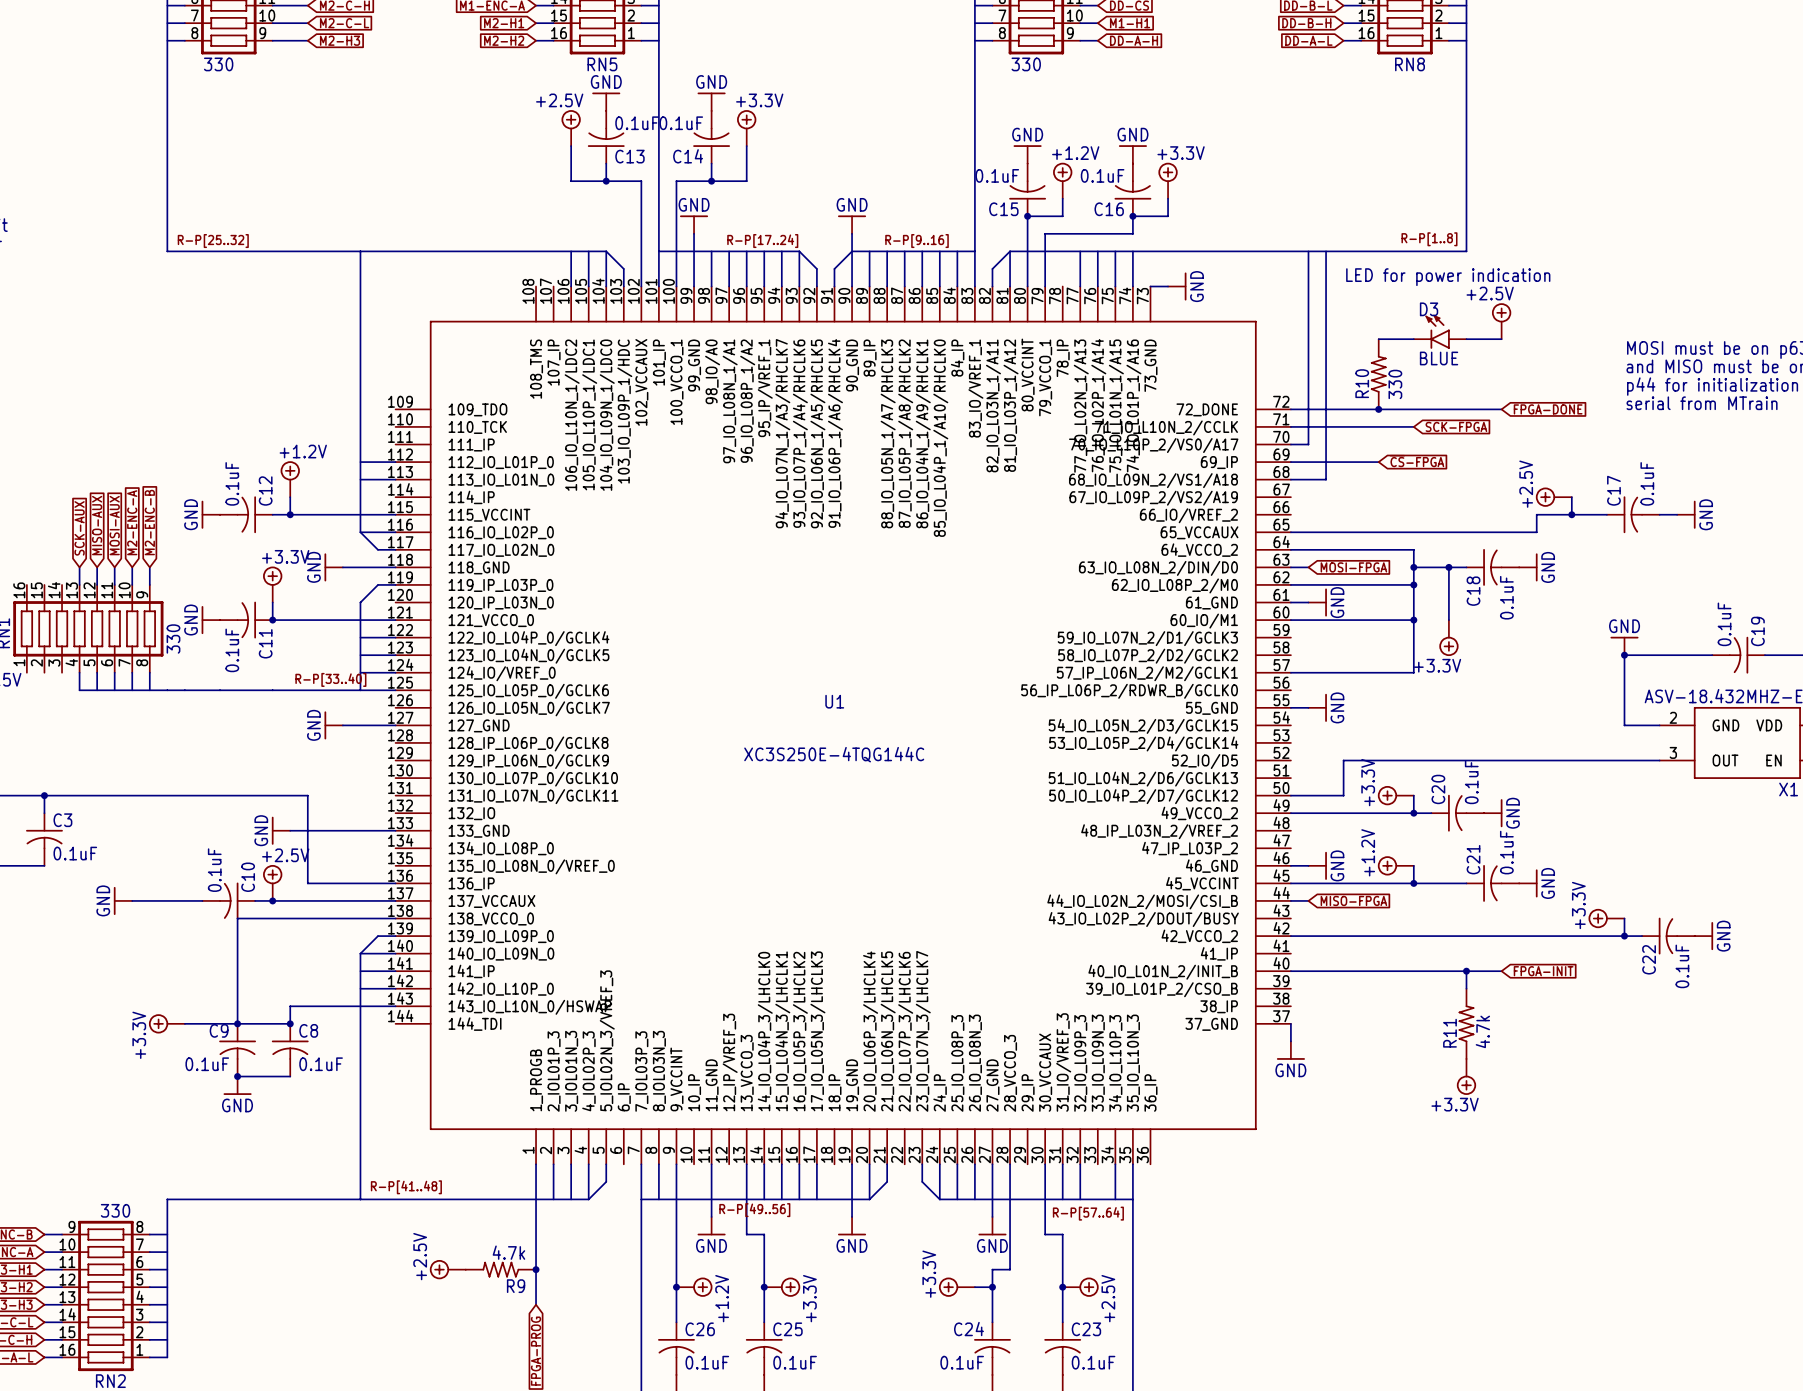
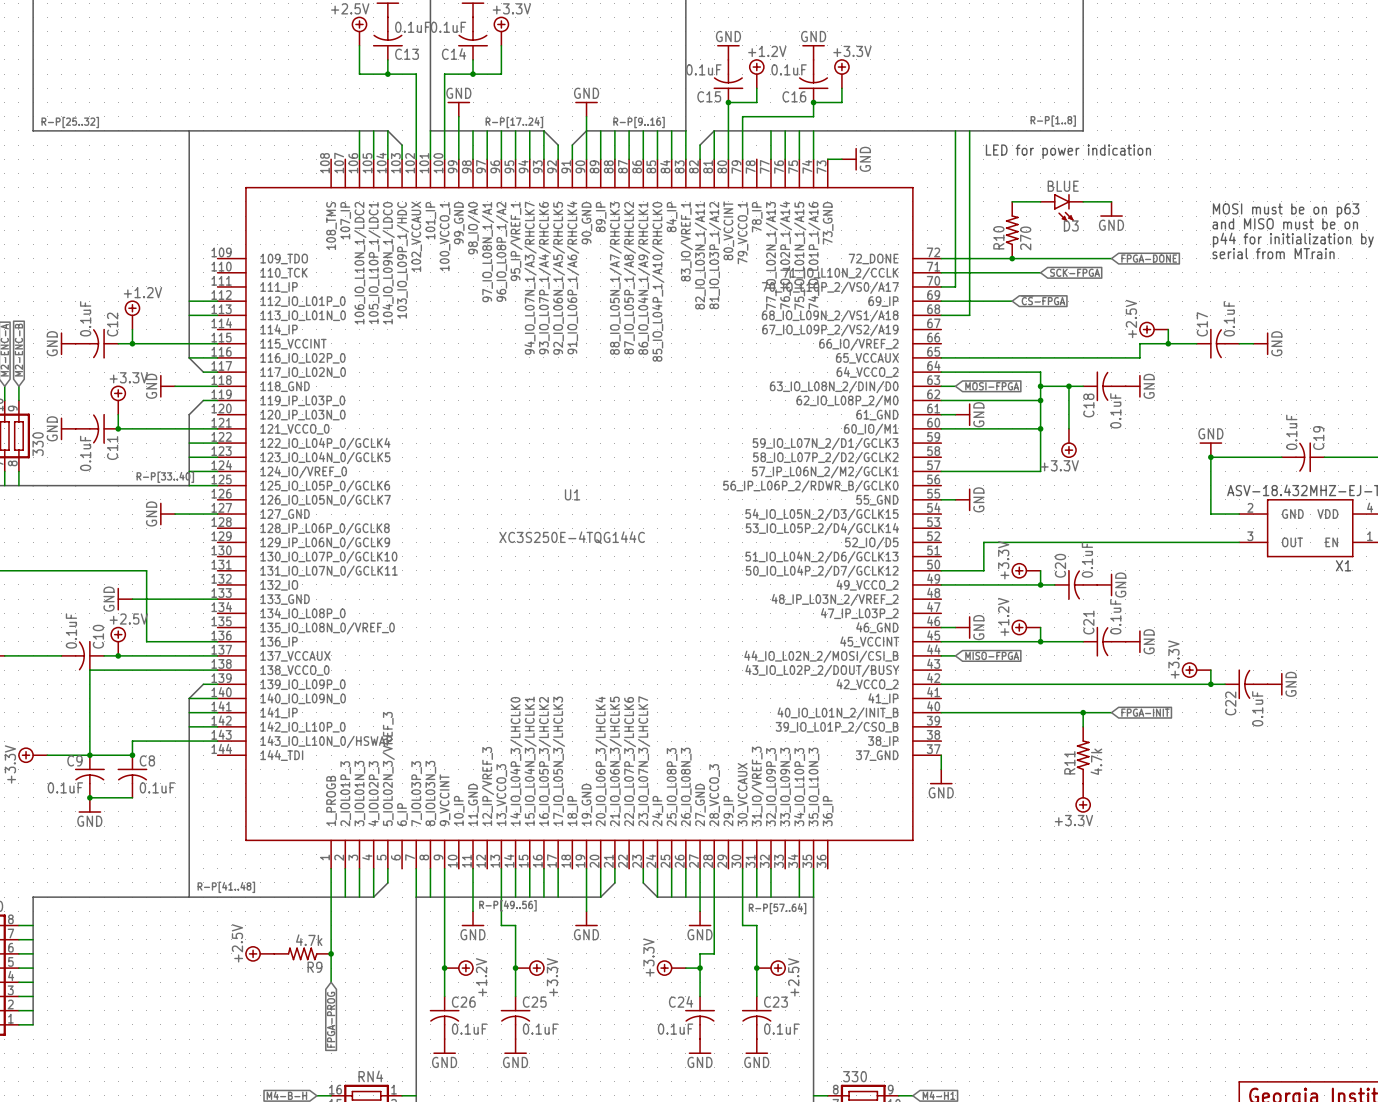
power symbol: +2.5V (1501, 321) -> none
D3 rotation: 0° (1437, 331) -> 180° (1063, 207)
power symbol: none -> GND (1111, 209)
R10 value: 330 (1395, 384) -> 270 (1025, 238)

